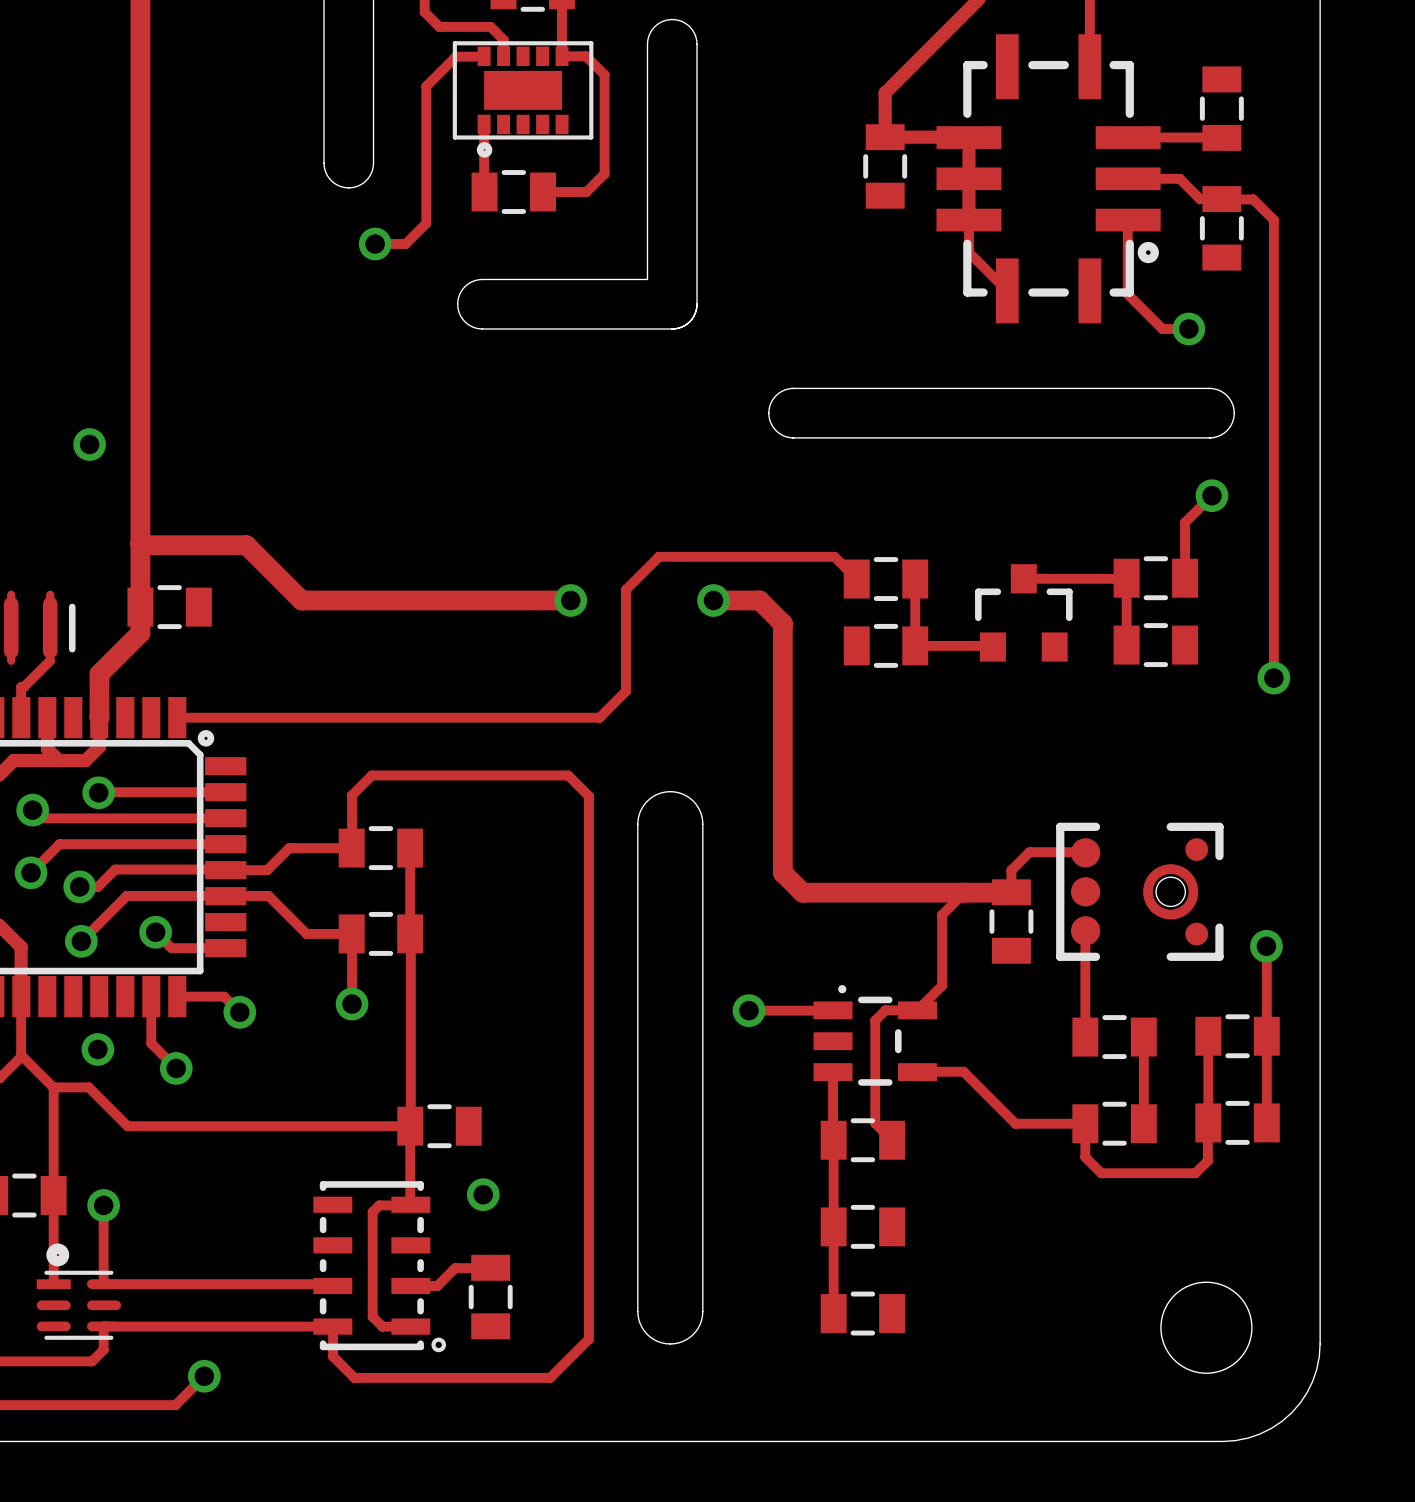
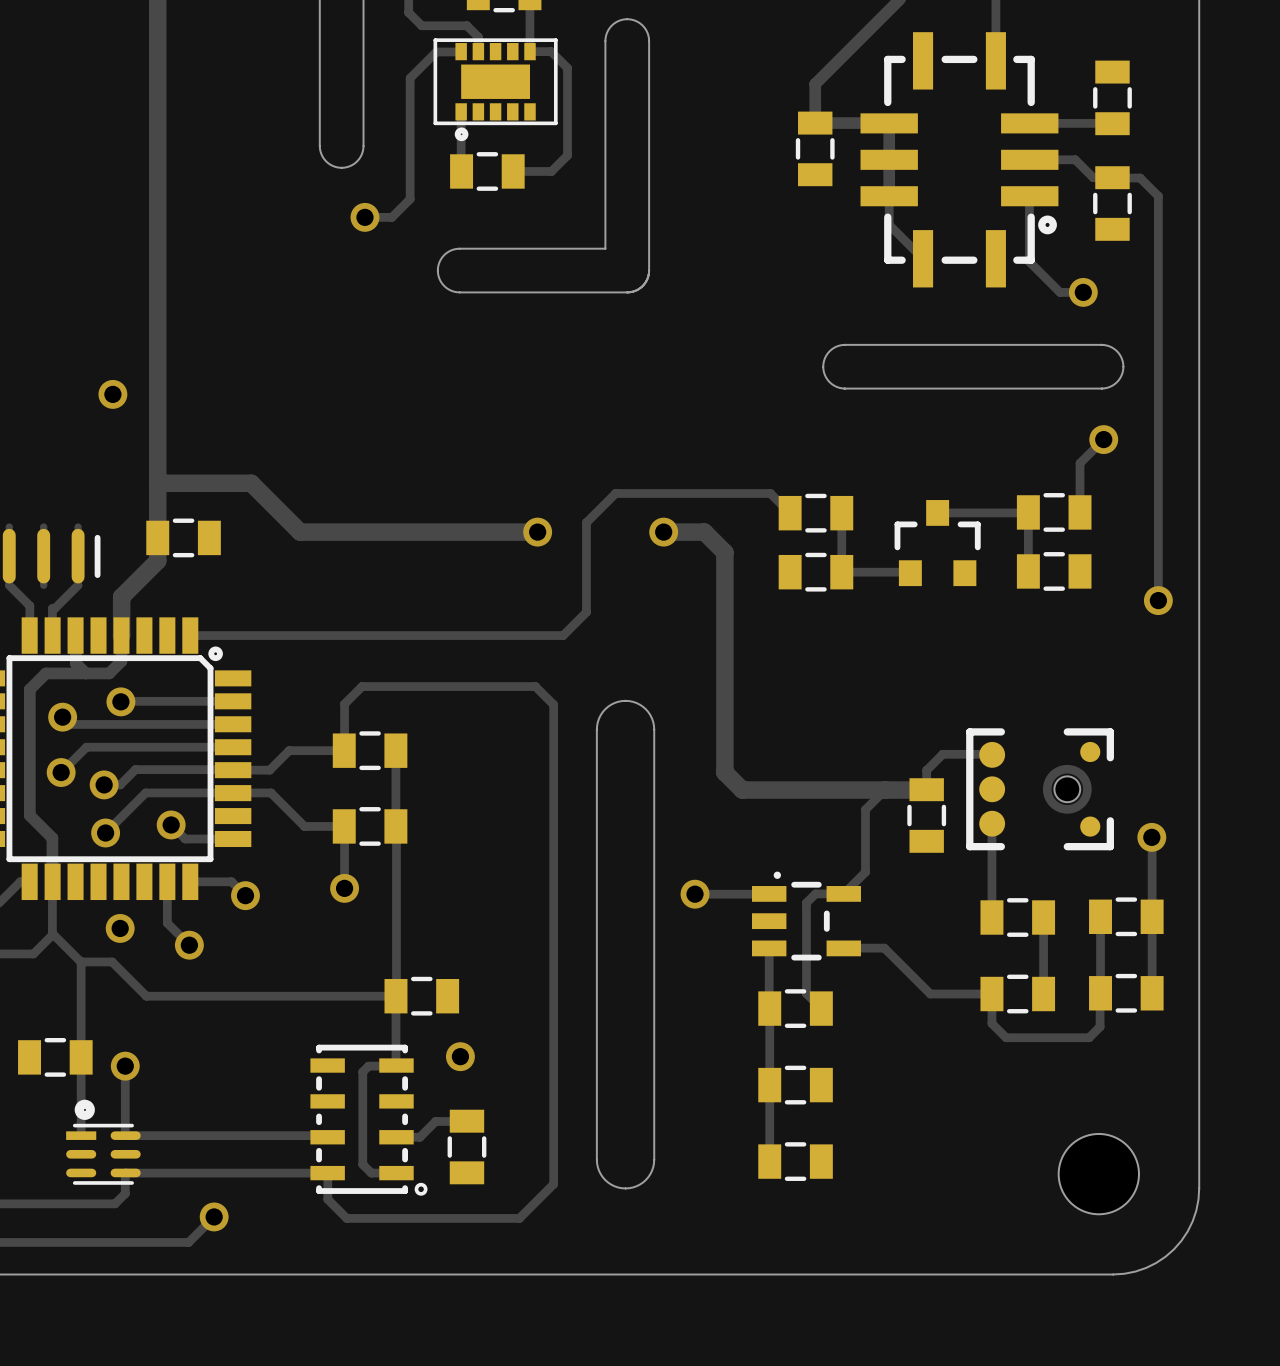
board edge: (792, 388) (918, 388) -> (845, 388) (836, 386) (829, 382) (824, 375) (823, 366) (824, 358) (829, 351) (836, 346) (845, 344)
board edge: (793, 388) (784, 390) (776, 395) (770, 403) (768, 413) (770, 422) (776, 430) (784, 436) (793, 437) -> none
board edge: (792, 437) (918, 437) -> none

